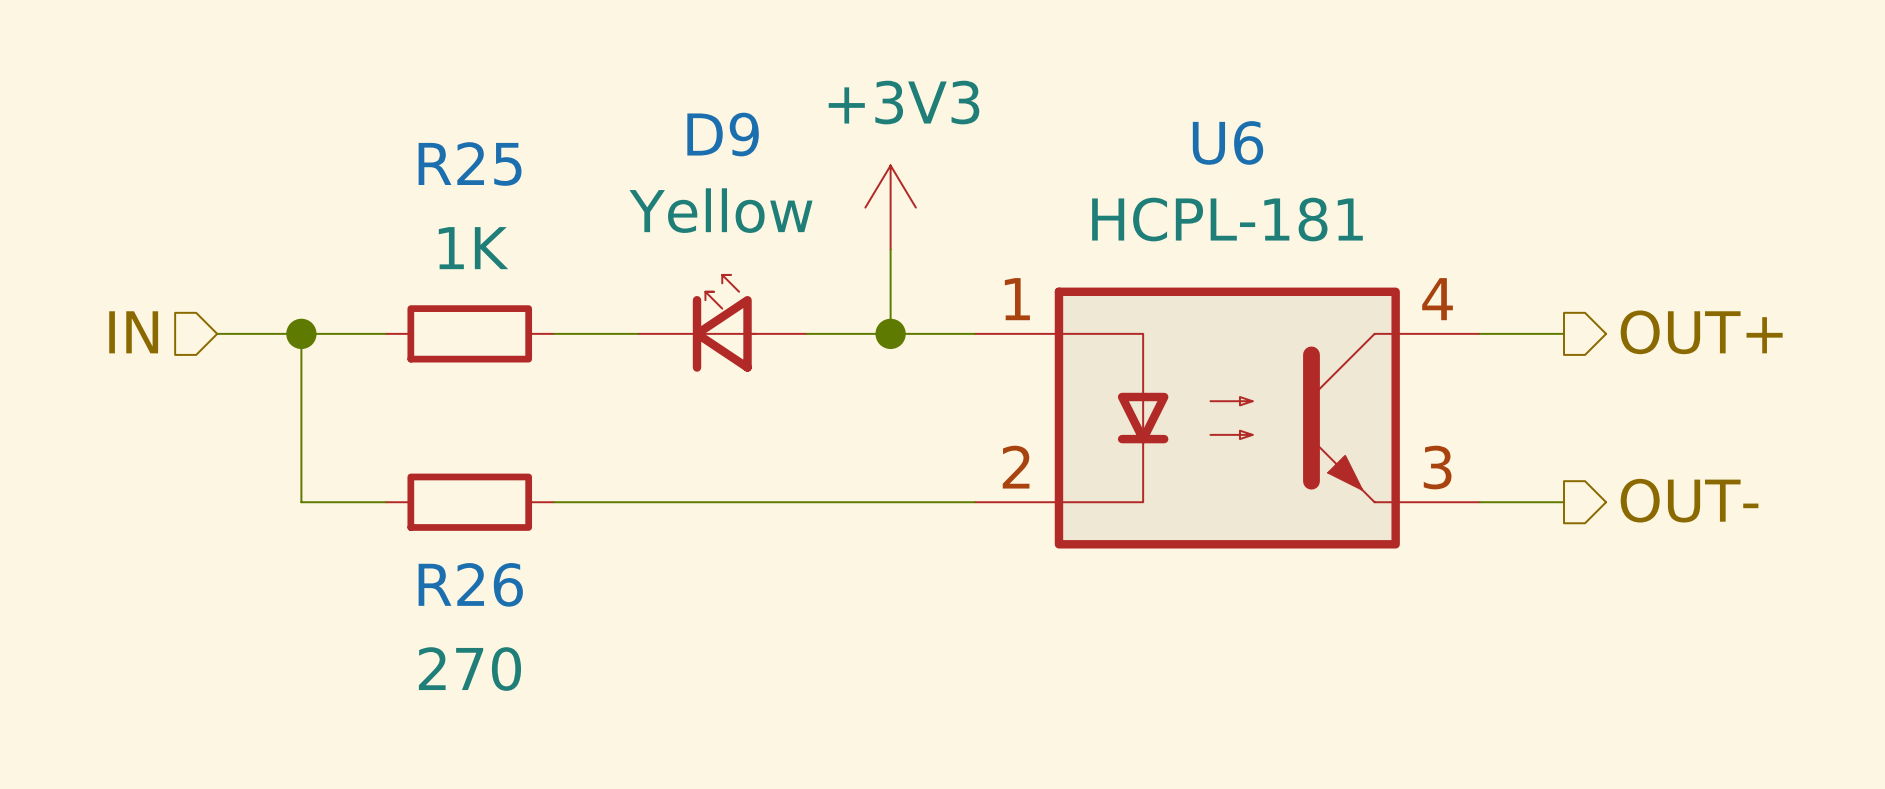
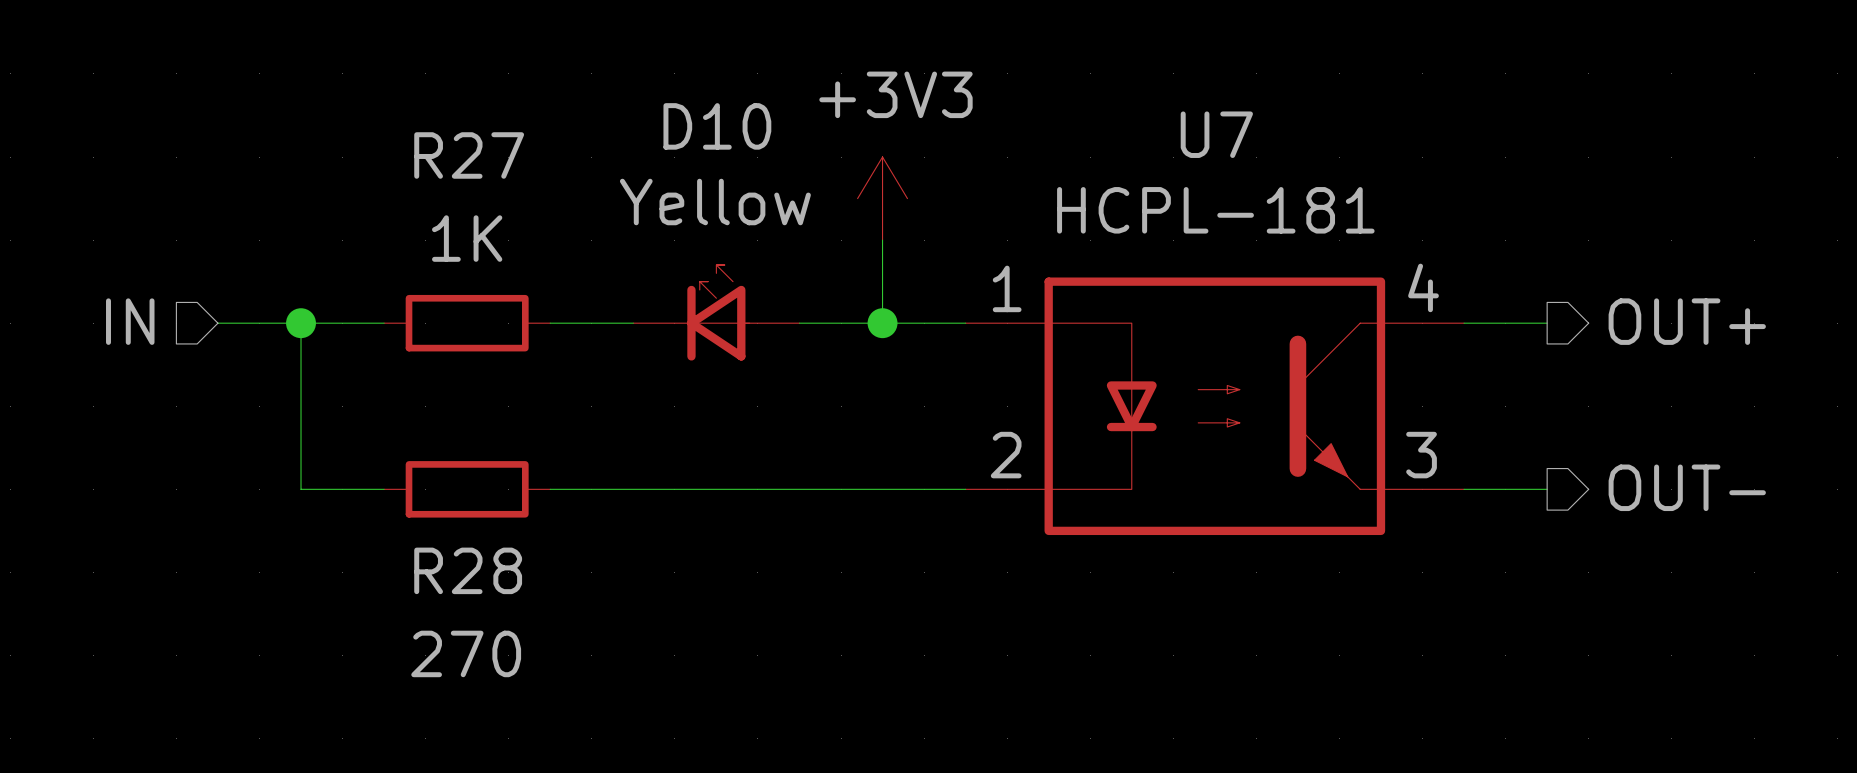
D9 name: D9 (723, 134) -> D10 (717, 126)
U6 name: U6 (1228, 142) -> U7 (1216, 134)
R25 name: R25 (470, 163) -> R27 (469, 155)
R26 name: R26 (470, 584) -> R28 (468, 570)

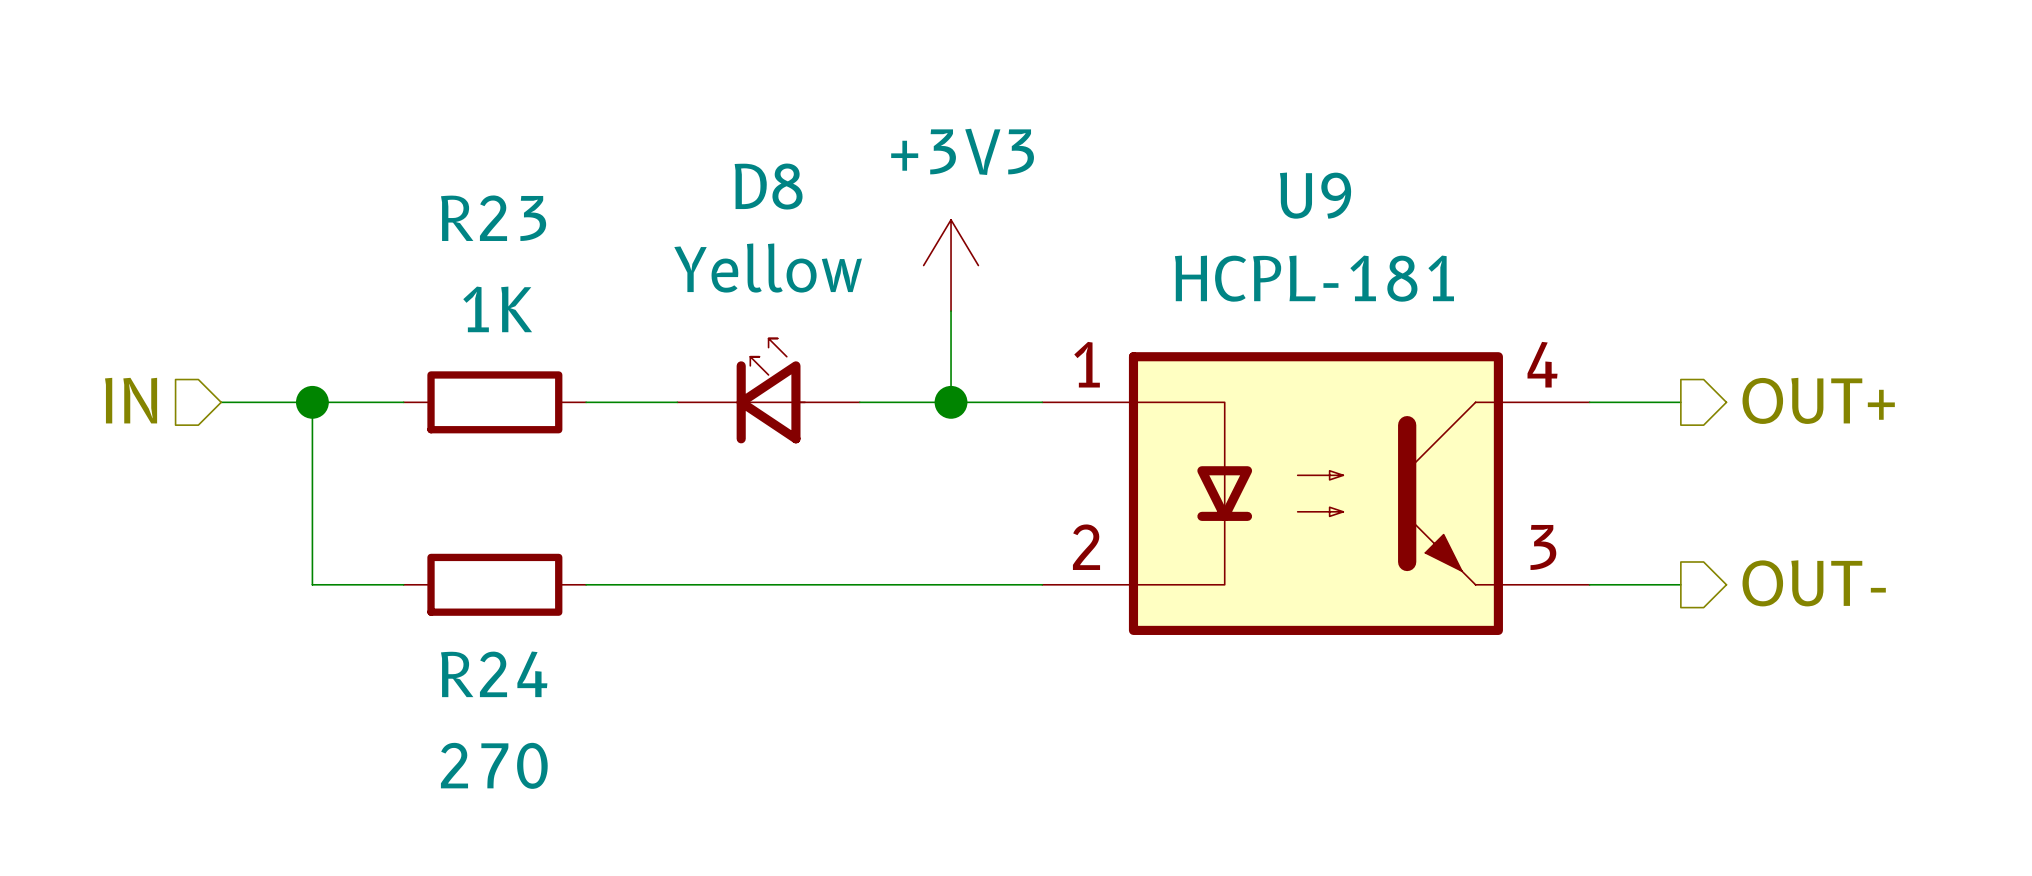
D10 name: D10 (717, 126) -> D8 (768, 186)
U7 name: U7 (1216, 134) -> U9 (1315, 195)
R27 name: R27 (469, 155) -> R23 (493, 218)
R28 name: R28 (468, 570) -> R24 (494, 674)

